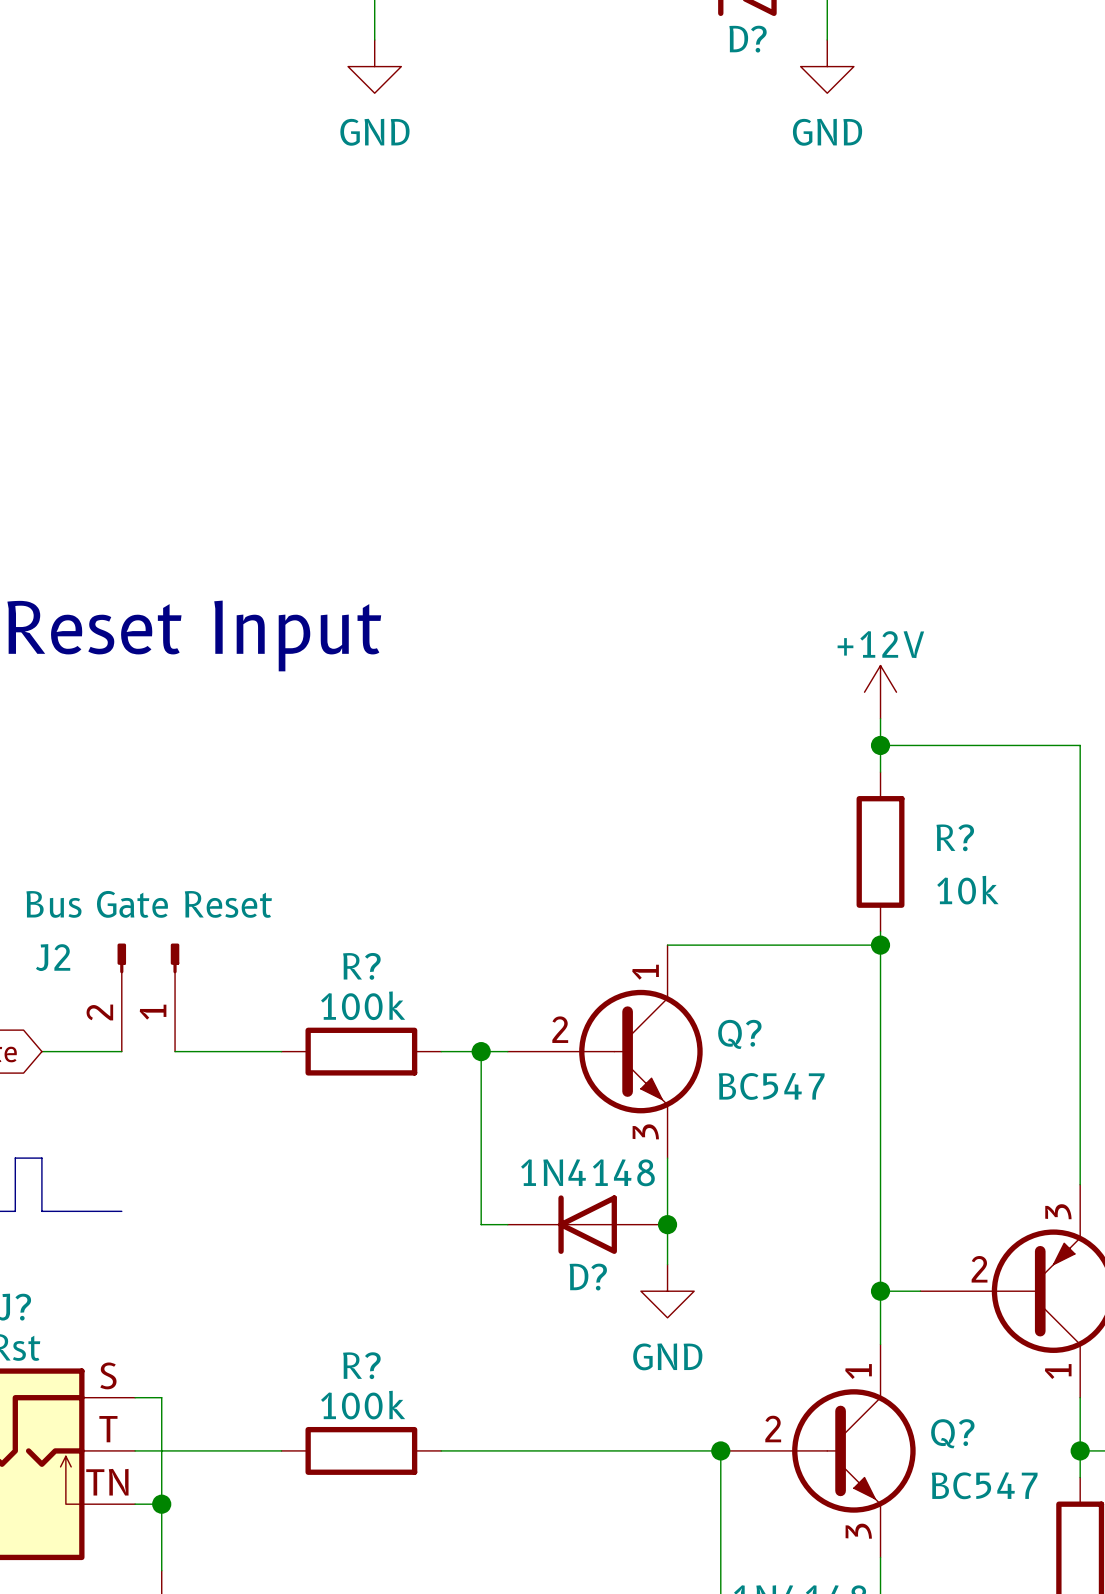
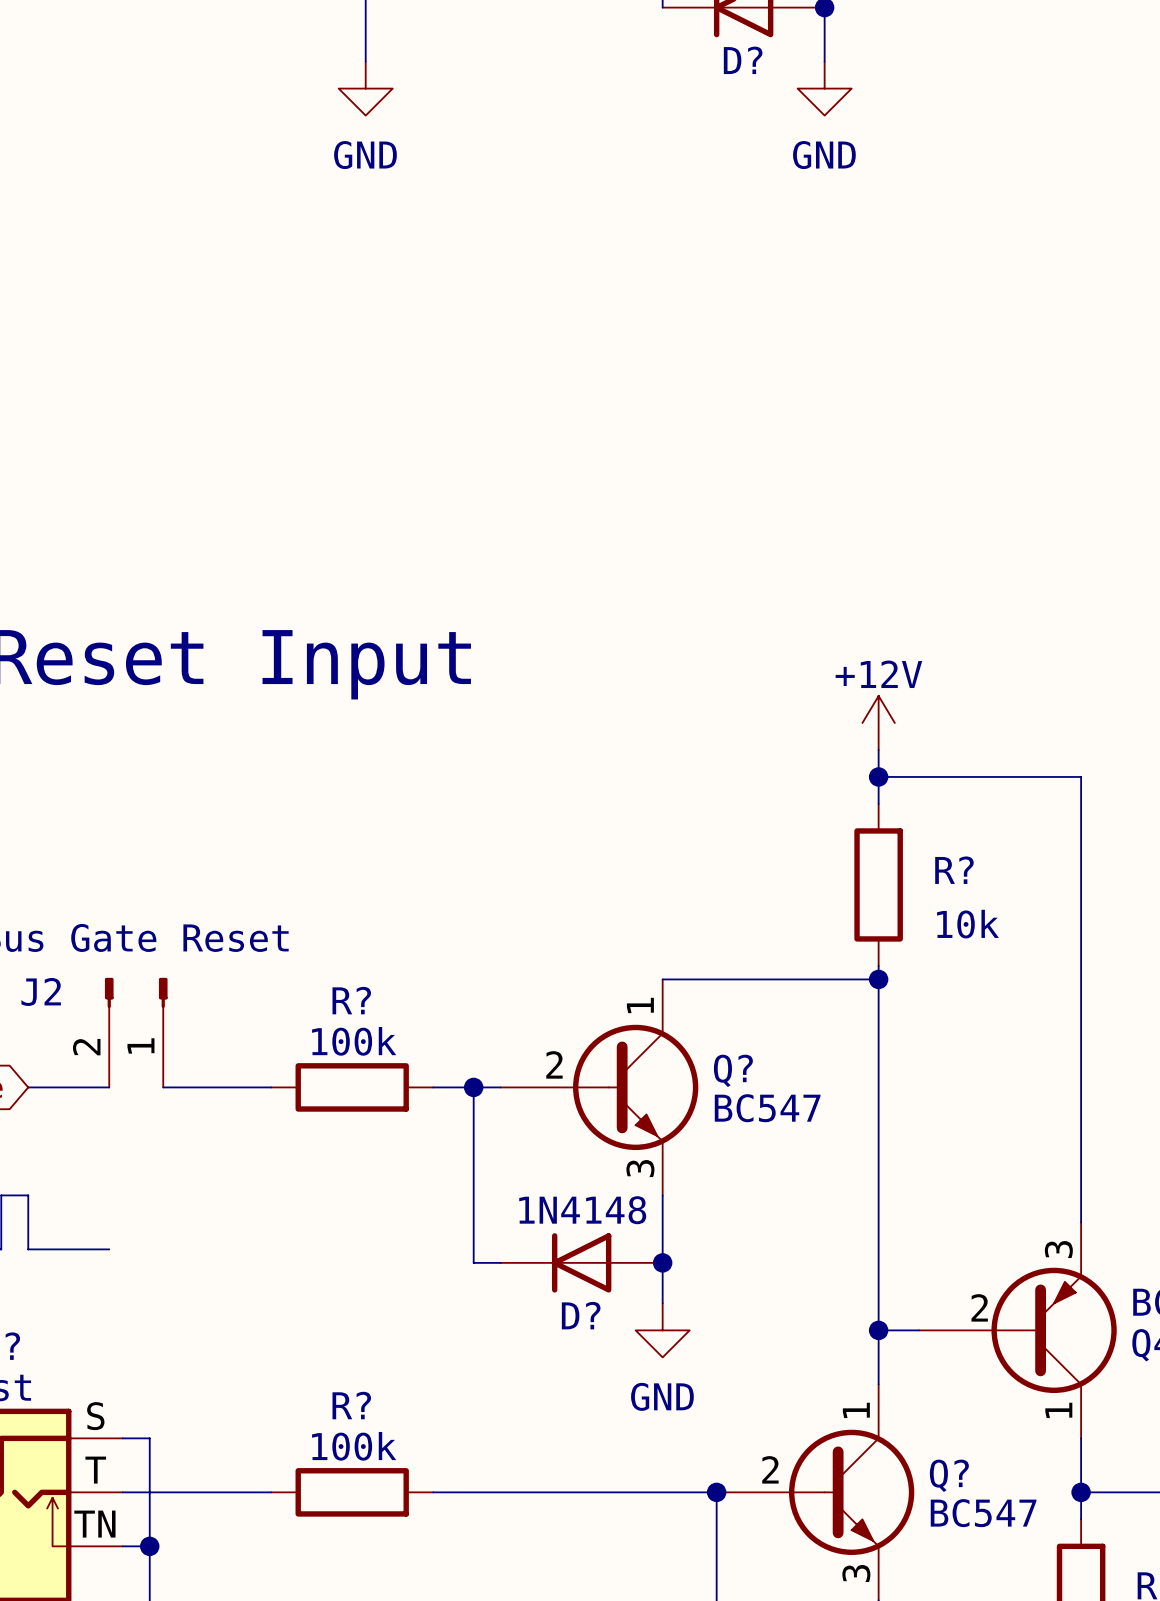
Q? value position: BC547 (771, 1086) -> BC547 (767, 1108)
Q? value position: BC547 (984, 1485) -> BC547 (983, 1513)

